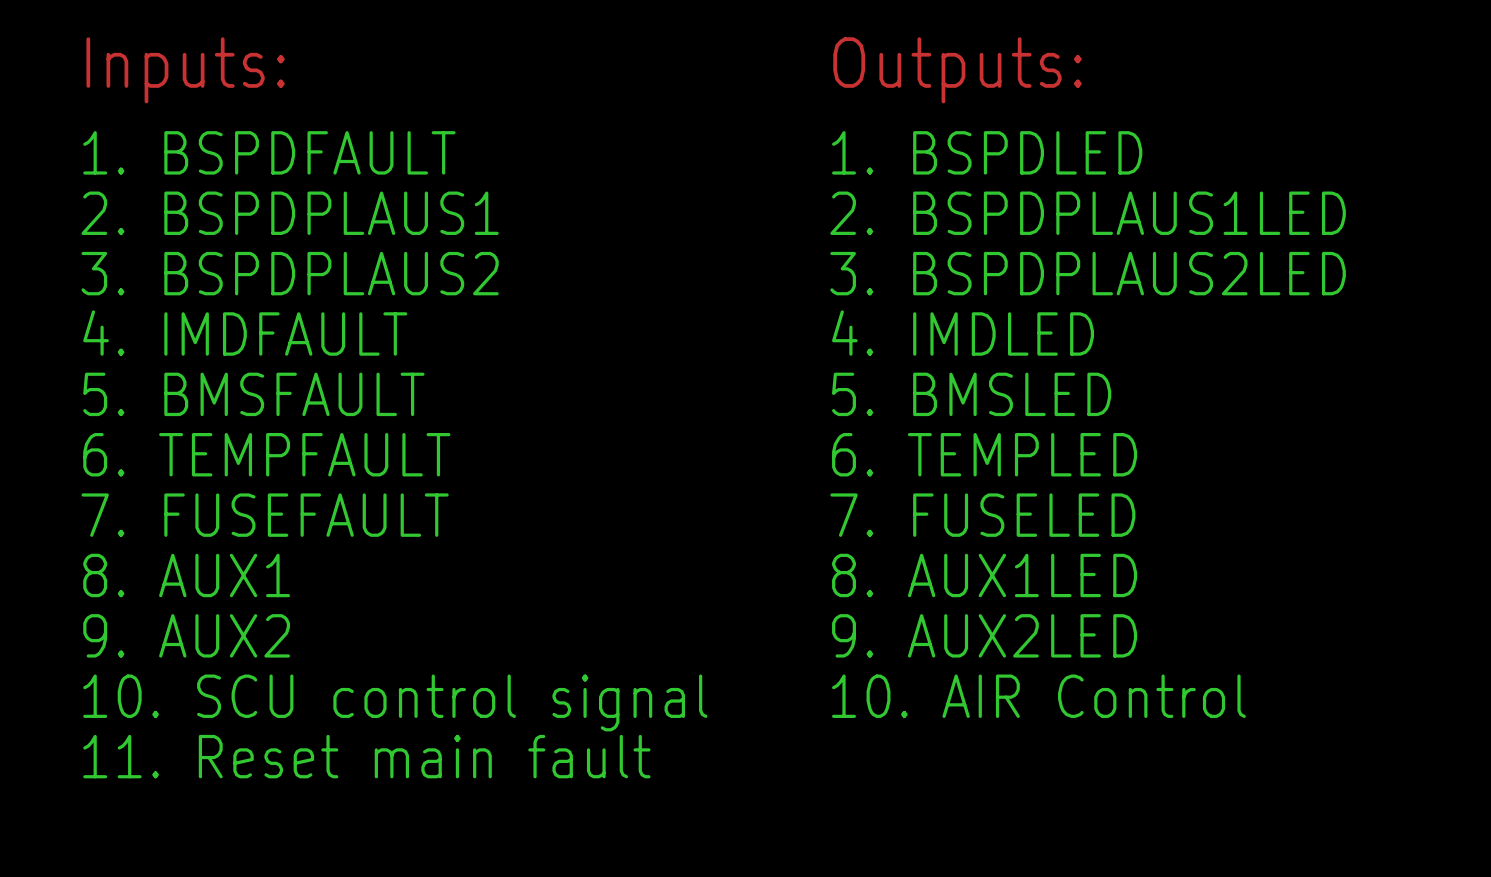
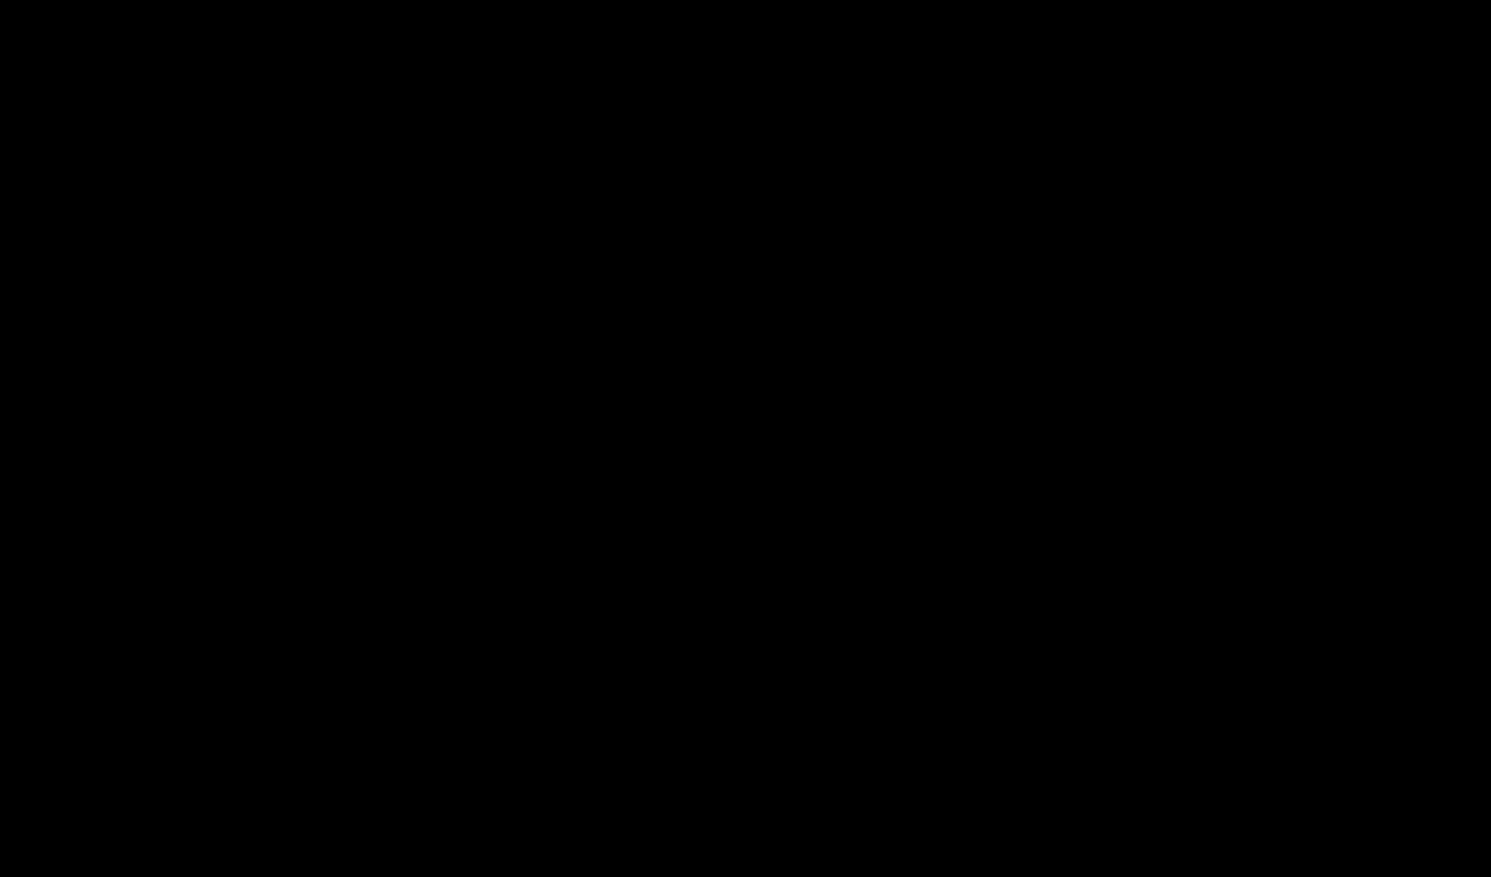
text: Inputs: (185, 70) -> none
text: Outputs: (957, 70) -> none
text: 1. BSPDFAULT (269, 152) -> none
text: 1. BSPDLED (987, 152) -> none
text: 2. BSPDPLAUS1 (290, 213) -> none
text: 2. BSPDPLAUS1LED (1088, 213) -> none
text: 3. BSPDPLAUS2 (290, 273) -> none
text: 3. BSPDPLAUS2LED (1088, 273) -> none
text: 4. IMDFAULT (245, 333) -> none
text: 4. IMDLED (963, 333) -> none
text: 5. BMSFAULT (253, 394) -> none
text: 5. BMSLED (971, 394) -> none
text: 6. TEMPFAULT (266, 454) -> none
text: 6. TEMPLED (984, 454) -> none
text: 7. FUSEFAULT (265, 515) -> none
text: 7. FUSELED (982, 515) -> none
text: 8. AUX1 (186, 575) -> none
text: 8. AUX1LED (984, 575) -> none
text: 9. AUX2 (186, 635) -> none
text: 9. AUX2LED (984, 635) -> none
text: 10. AIR Control (1038, 696) -> none
text: 10. SCU control signal (395, 702) -> none
text: 11. Reset main fault (366, 756) -> none

